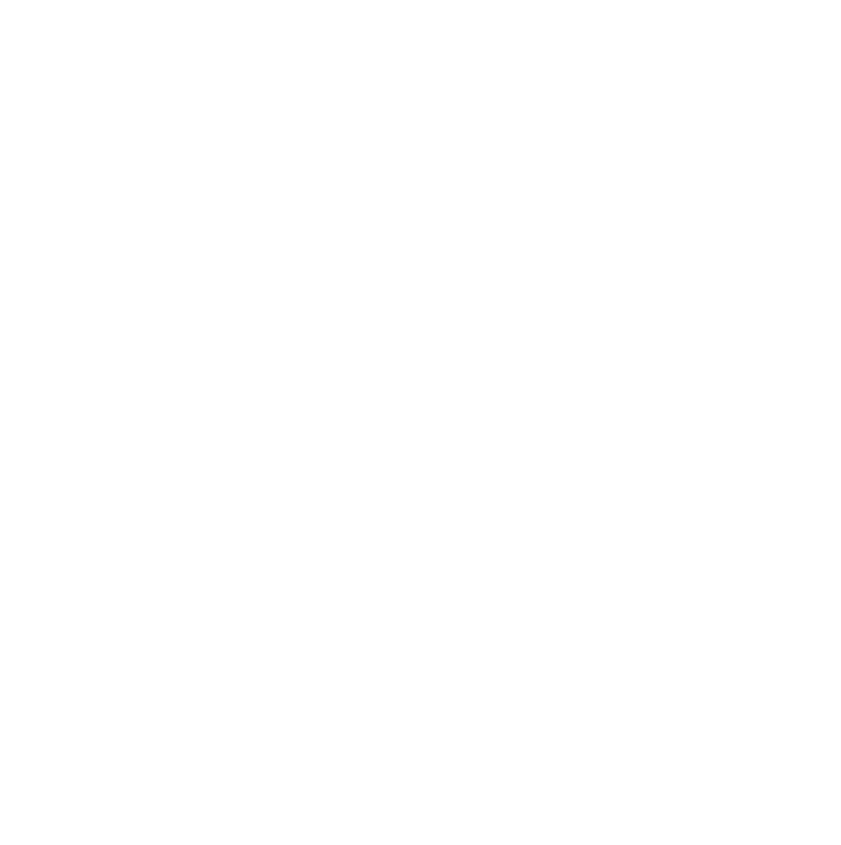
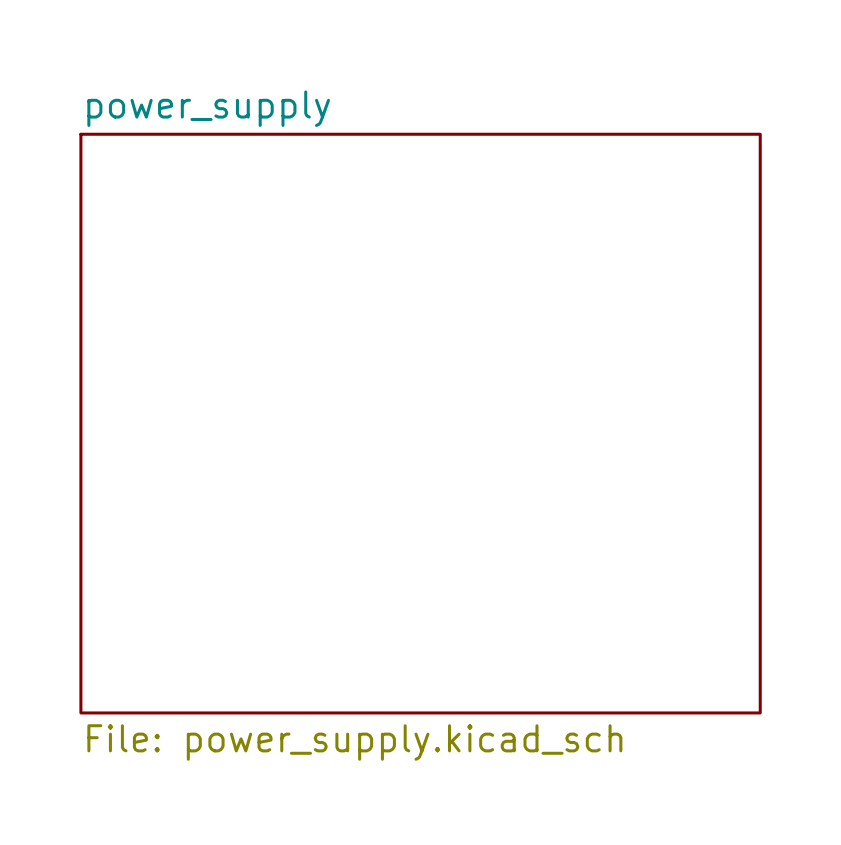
sheet power_supply: none -> File: power_supply.kicad_sch (420, 423)

